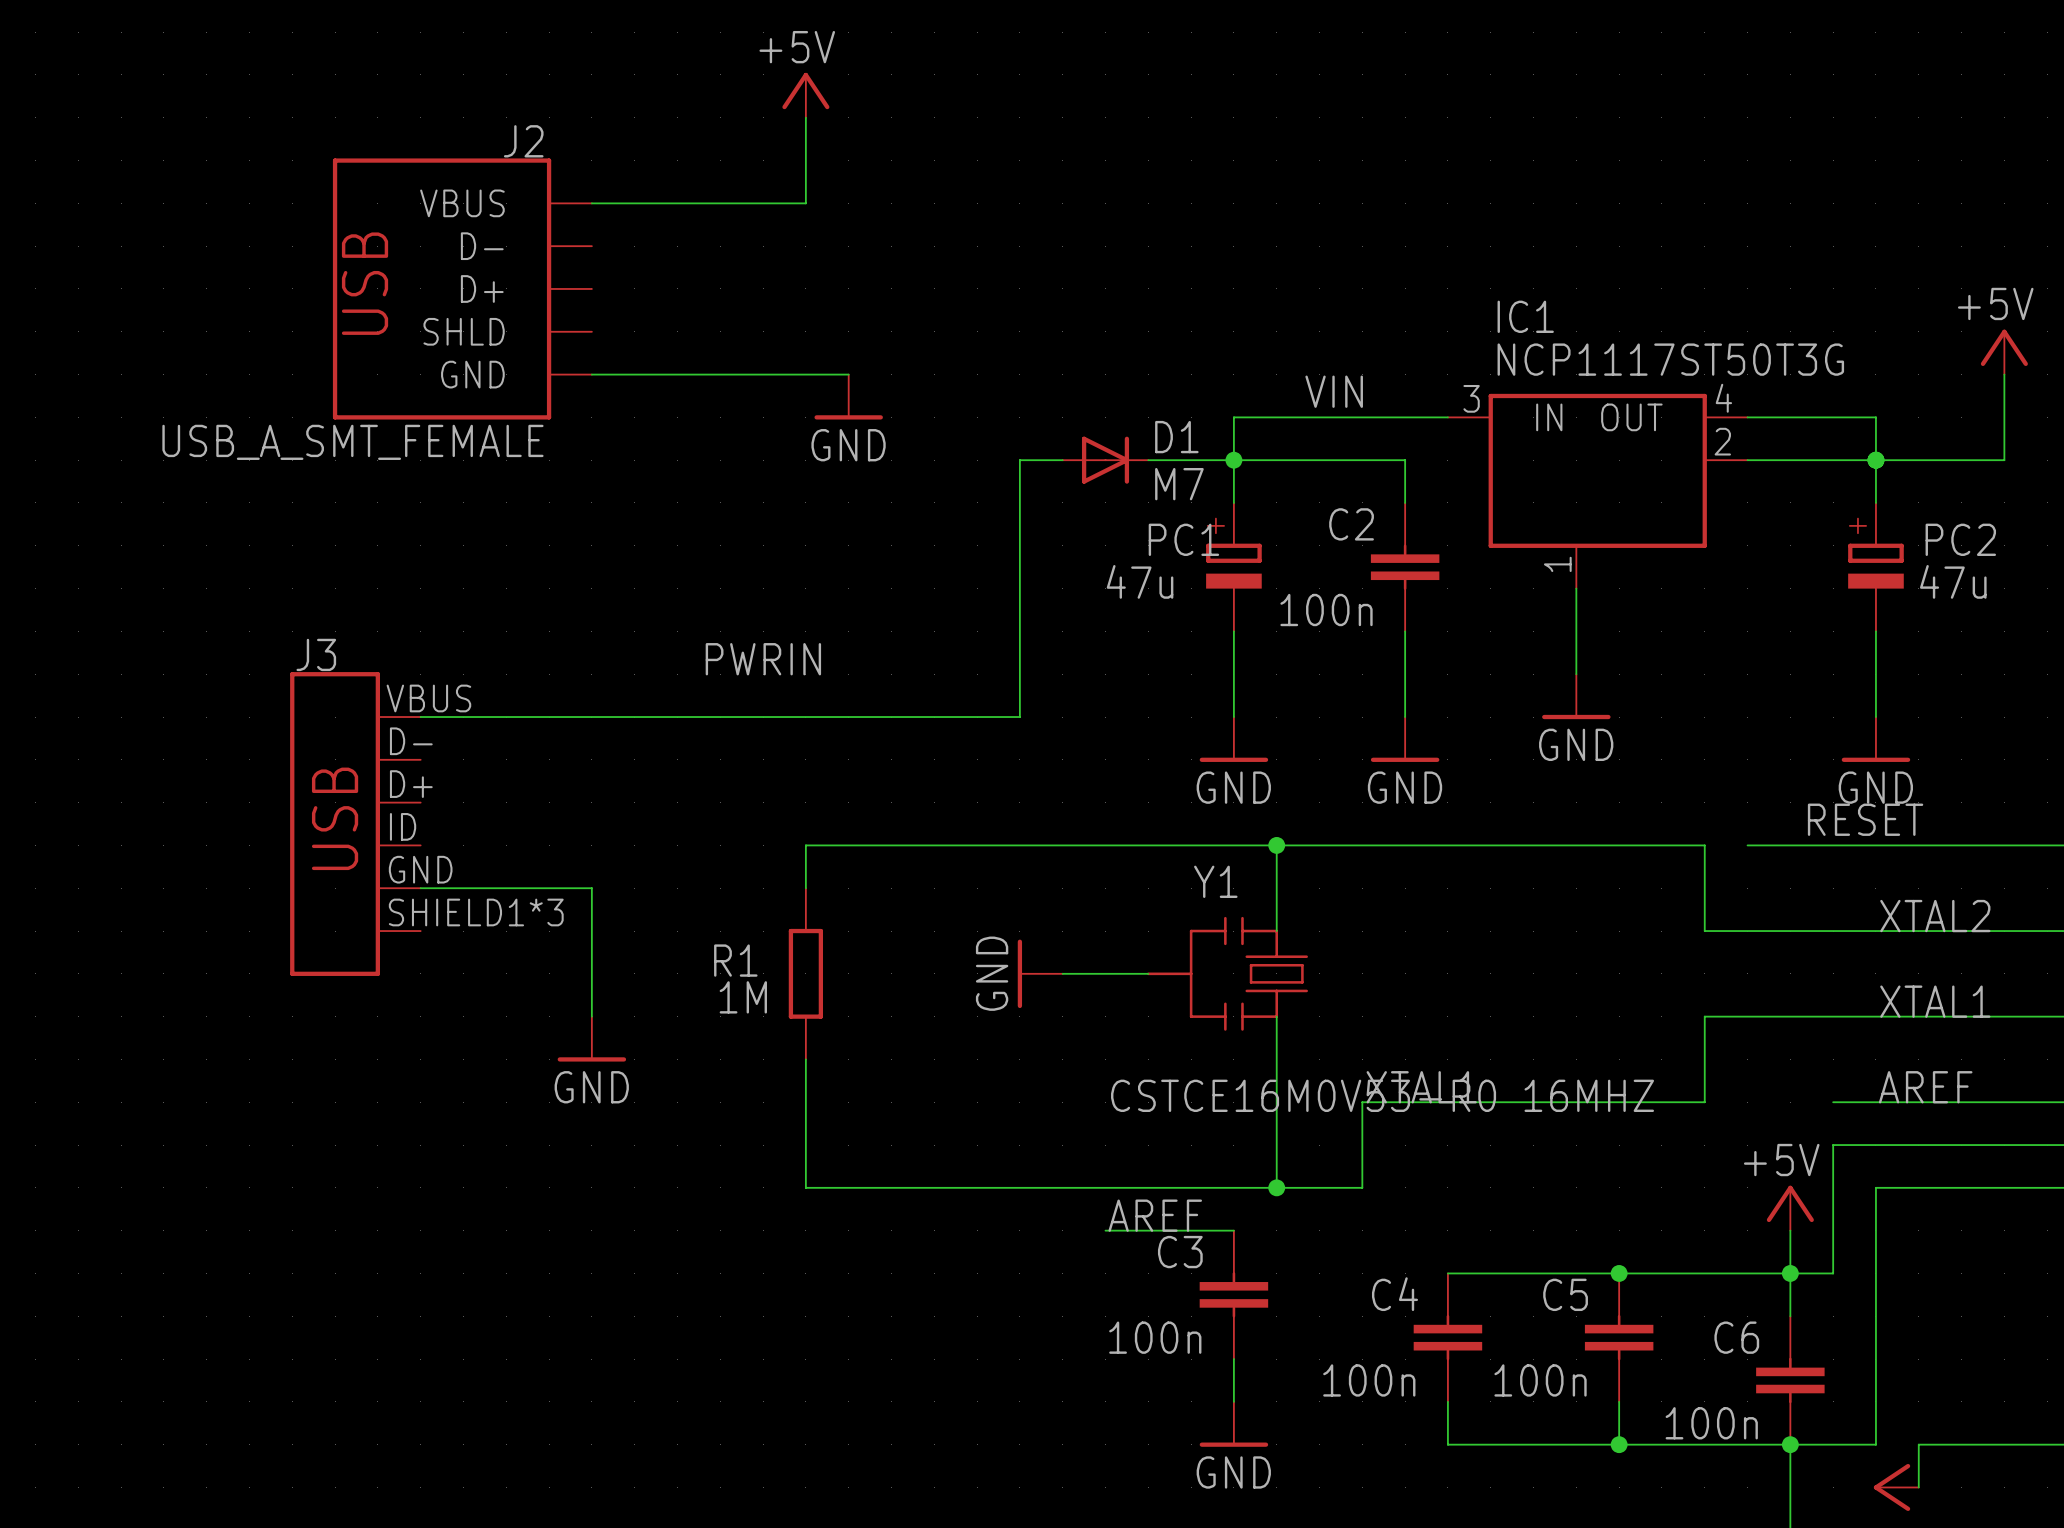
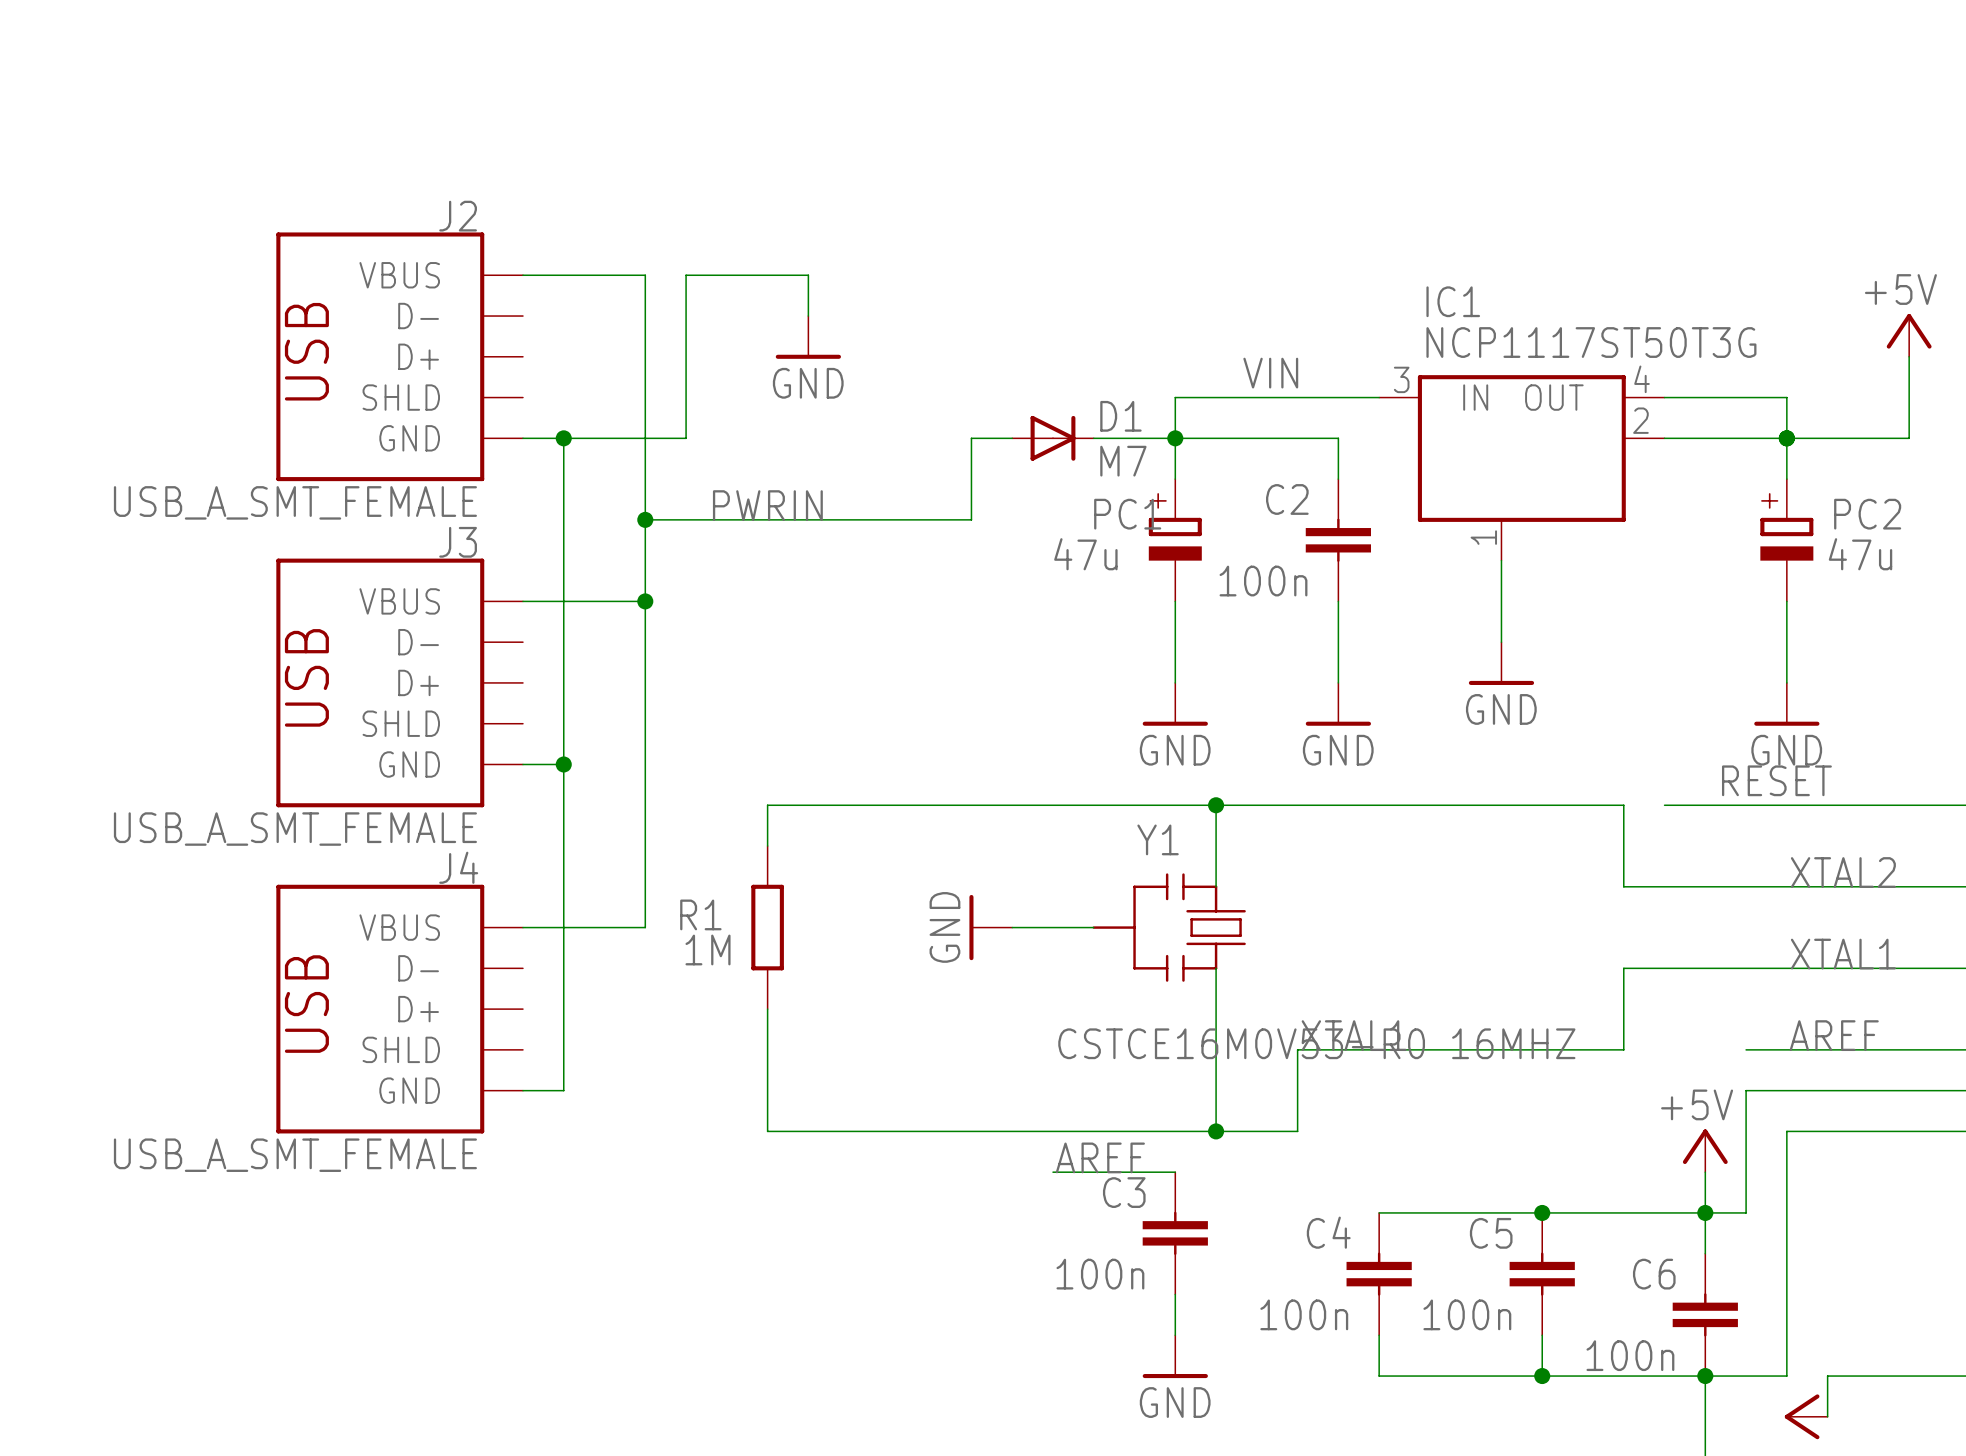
power symbol: +5V (805, 95) -> none
wire: (805, 117) (805, 203) (591, 203) -> none
J2 position: (462, 288) -> (399, 356)
wire: none -> (522, 275) (645, 275) (645, 927) (522, 927)
wire: none -> (808, 316) (808, 275) (686, 275) (686, 438) (522, 438)
wire: (591, 374) (848, 374) -> none
power symbol position: GND (848, 397) -> GND (808, 337)
junction: none -> (563, 438)
junction: none -> (645, 519)
wire: (1019, 545) (1019, 717) (420, 717) -> (971, 519) (645, 519)
wire: none -> (522, 601) (645, 601)
junction: none -> (645, 601)
J3 name position: J3 (316, 654) -> J3 (458, 542)
label position: PWRIN (763, 659) -> PWRIN (767, 505)
J3 symbol: [290, 672, 421, 976] -> [276, 558, 523, 808]
wire: none -> (522, 764) (563, 764)
junction: none -> (563, 764)
J3 value: none -> USB_A_SMT_FEMALE (295, 829)
wire: (420, 888) (591, 888) -> (563, 438) (563, 846)
wire: none -> (563, 968) (563, 1090) (522, 1090)
power symbol: GND (591, 1039) -> none
J4: none -> USB_A_SMT_FEMALE (399, 1009)

